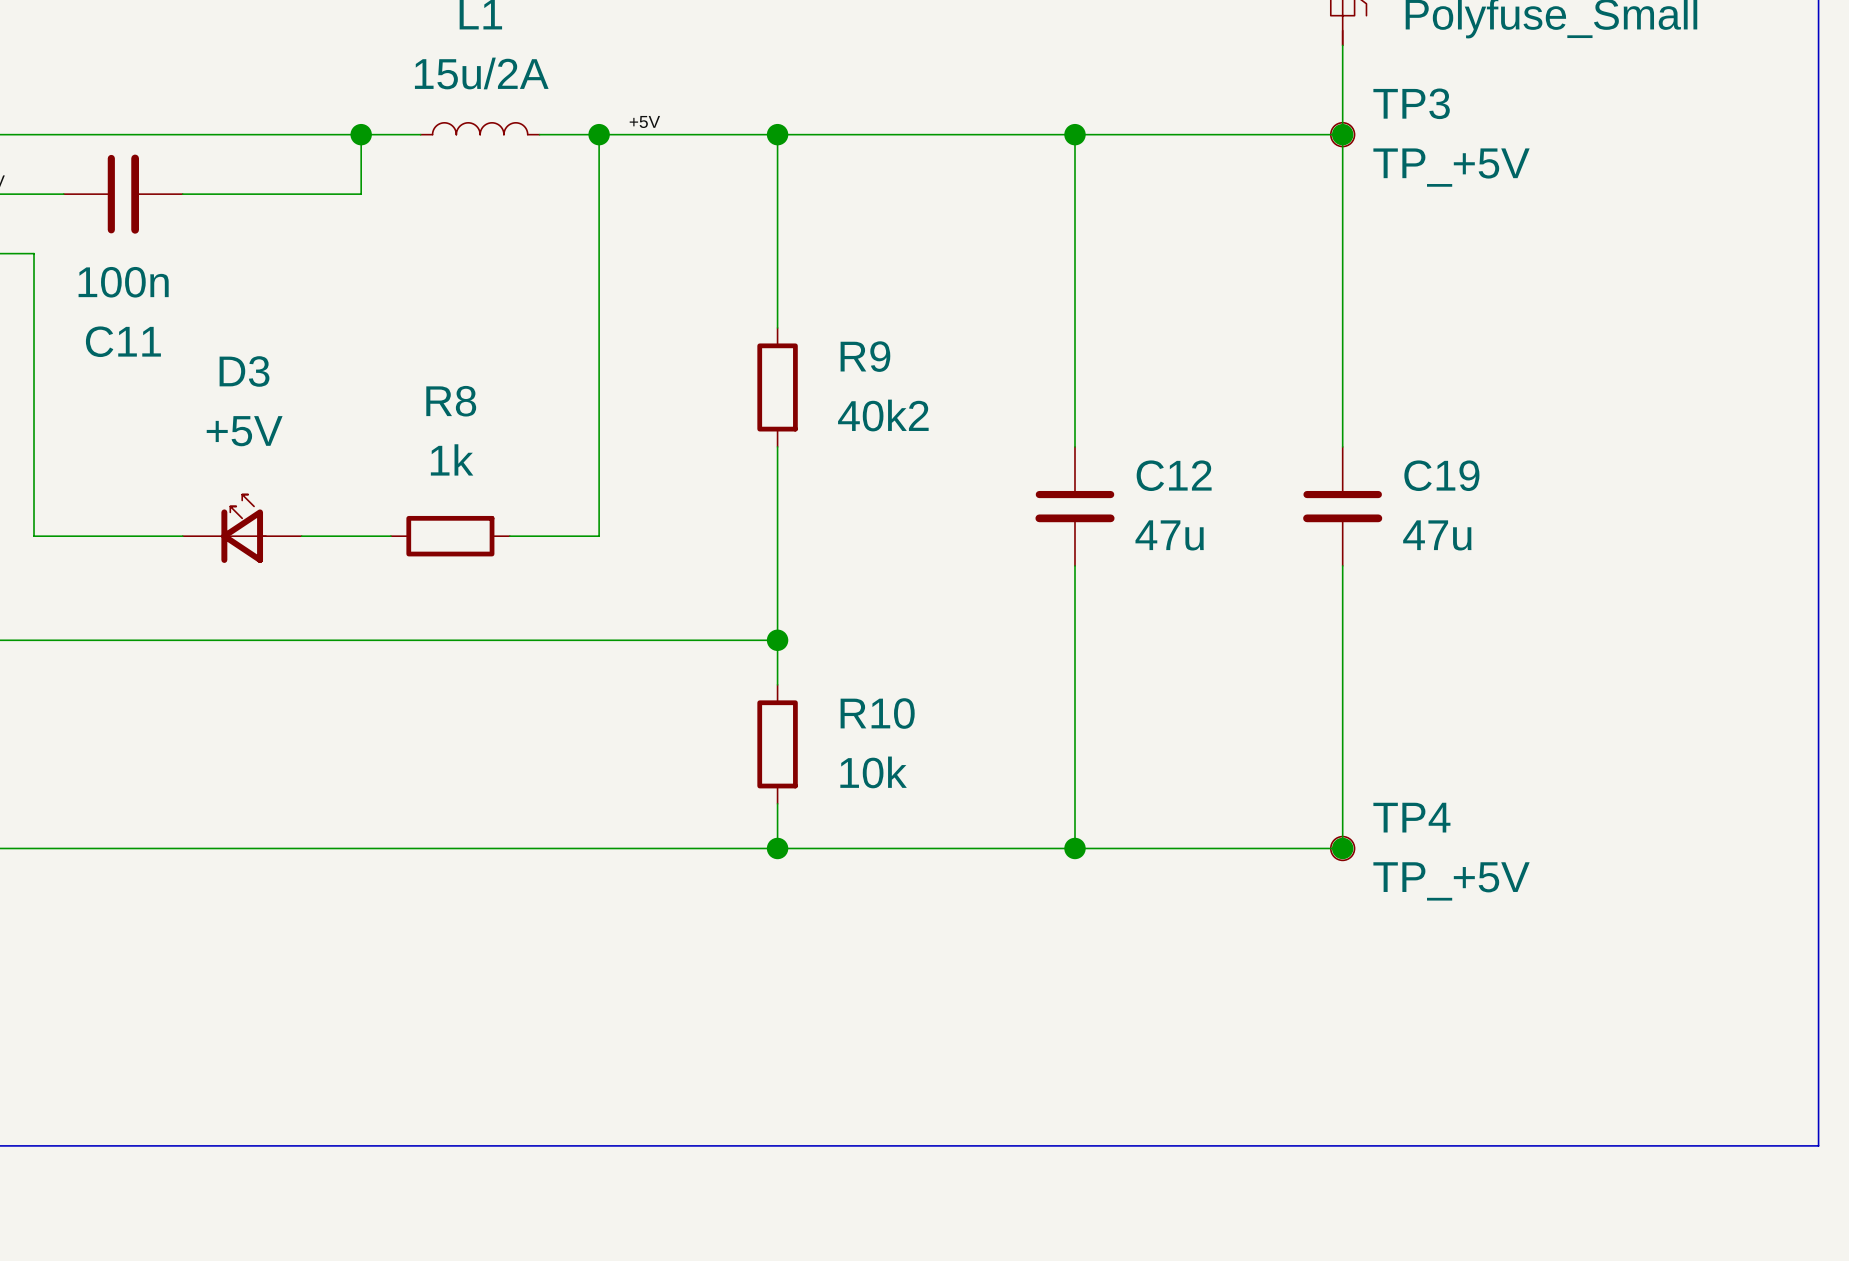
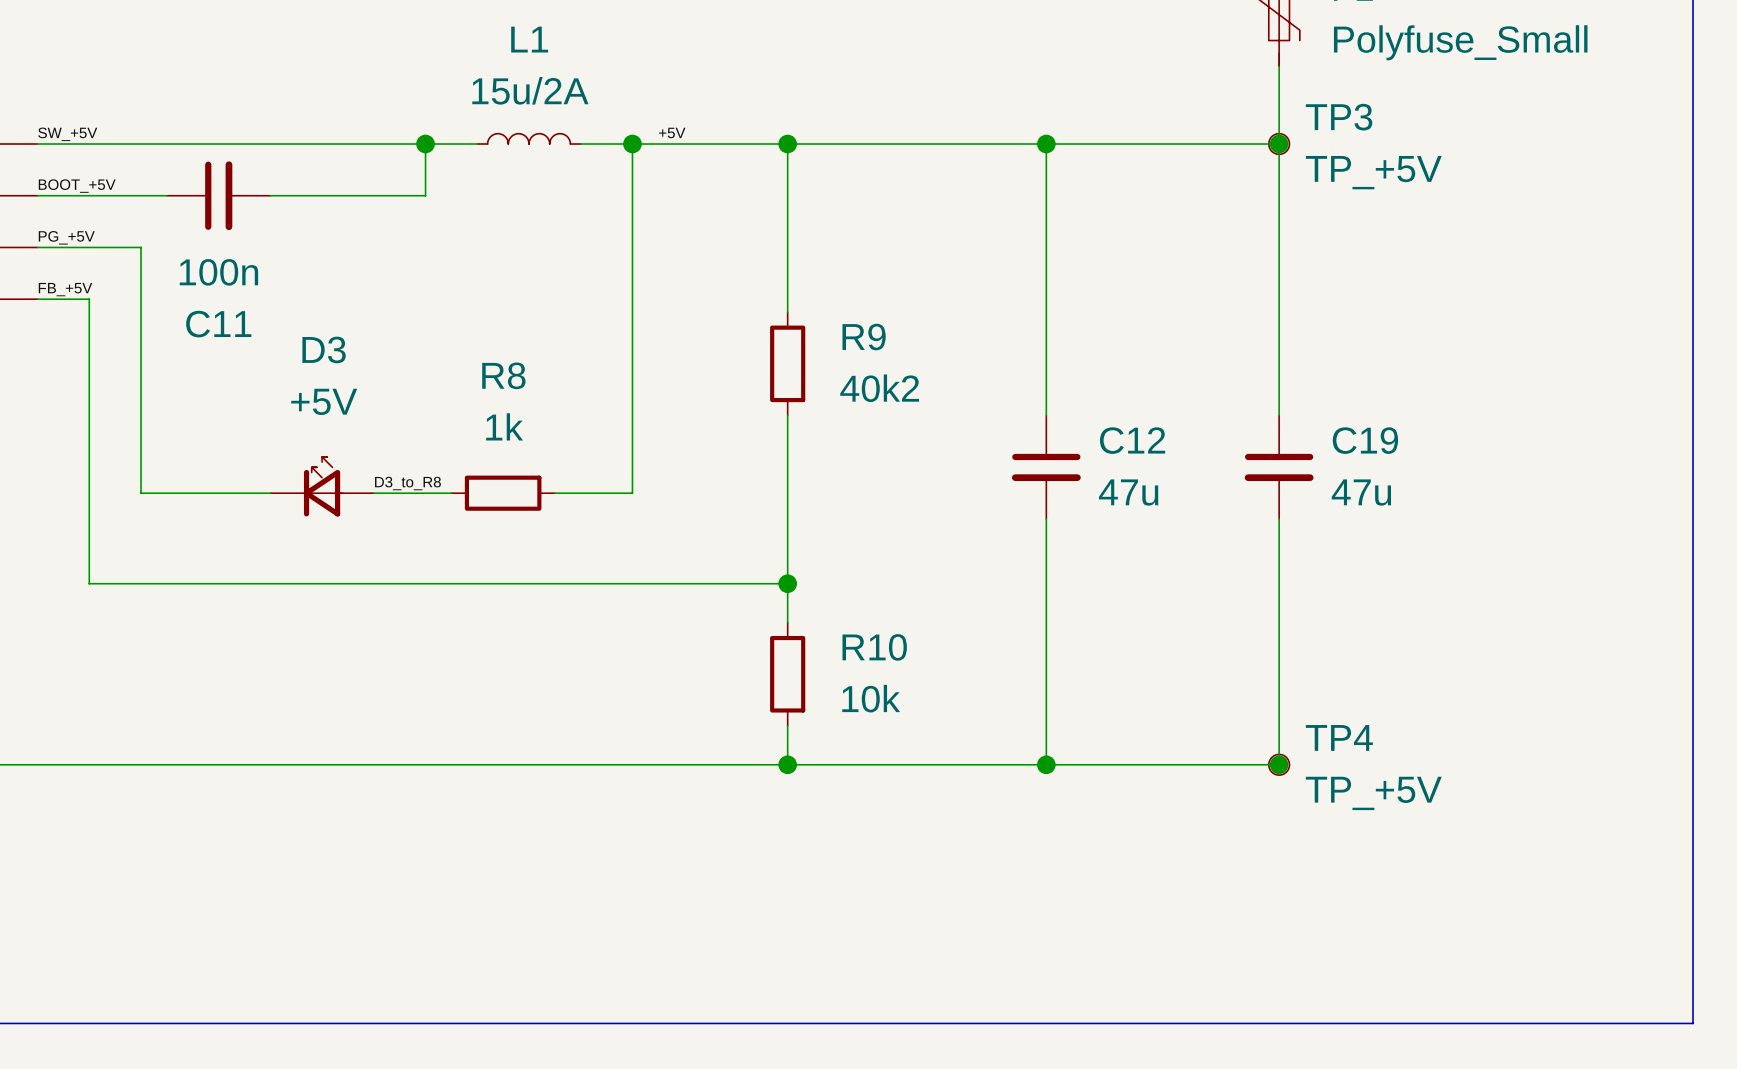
label: none -> D3_to_R8 (407, 483)

